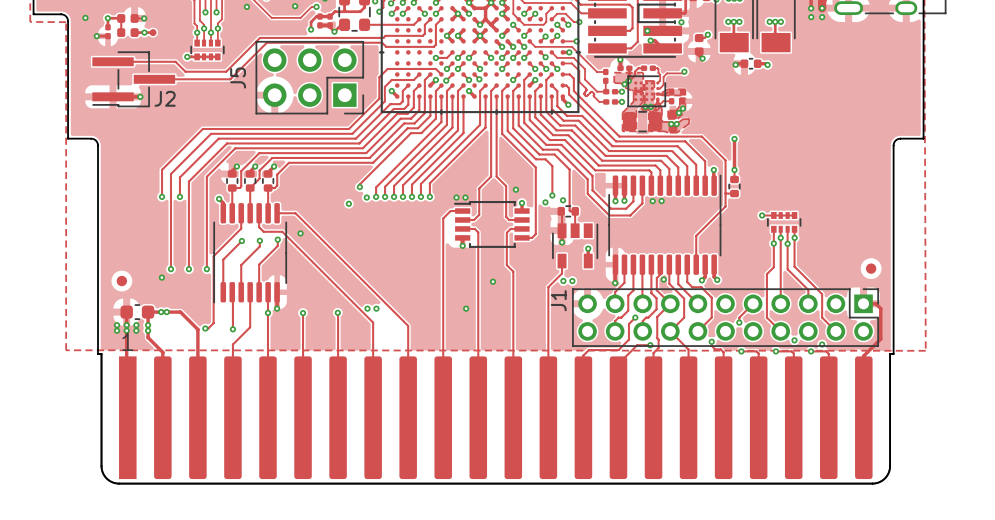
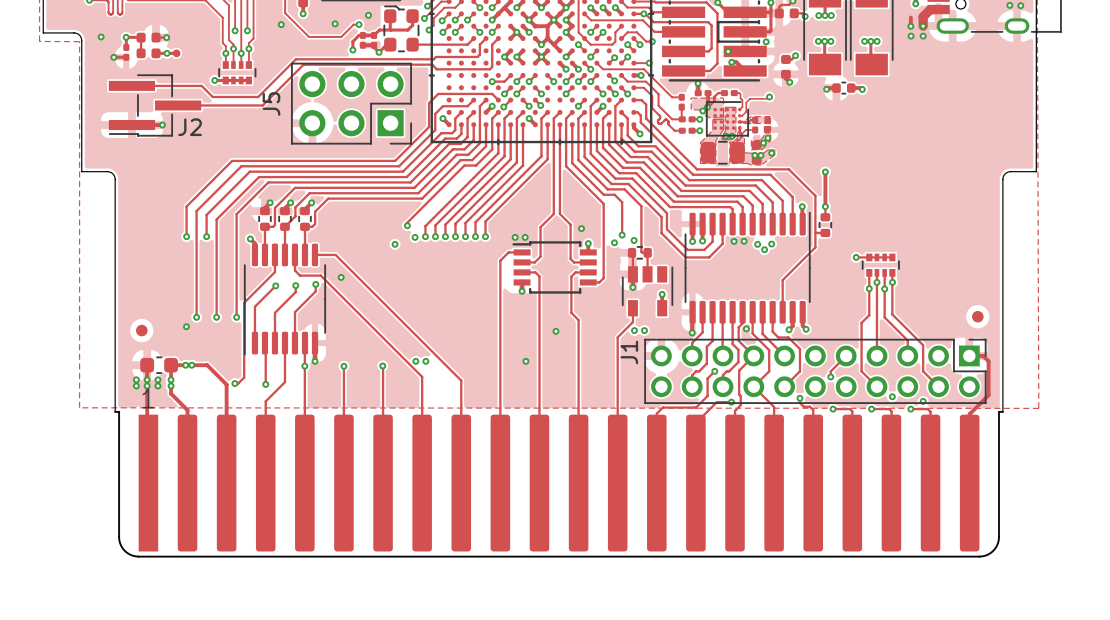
via: none -> (771, 153)
via: none -> (757, 244)
via: none -> (771, 244)
via: none -> (764, 249)

